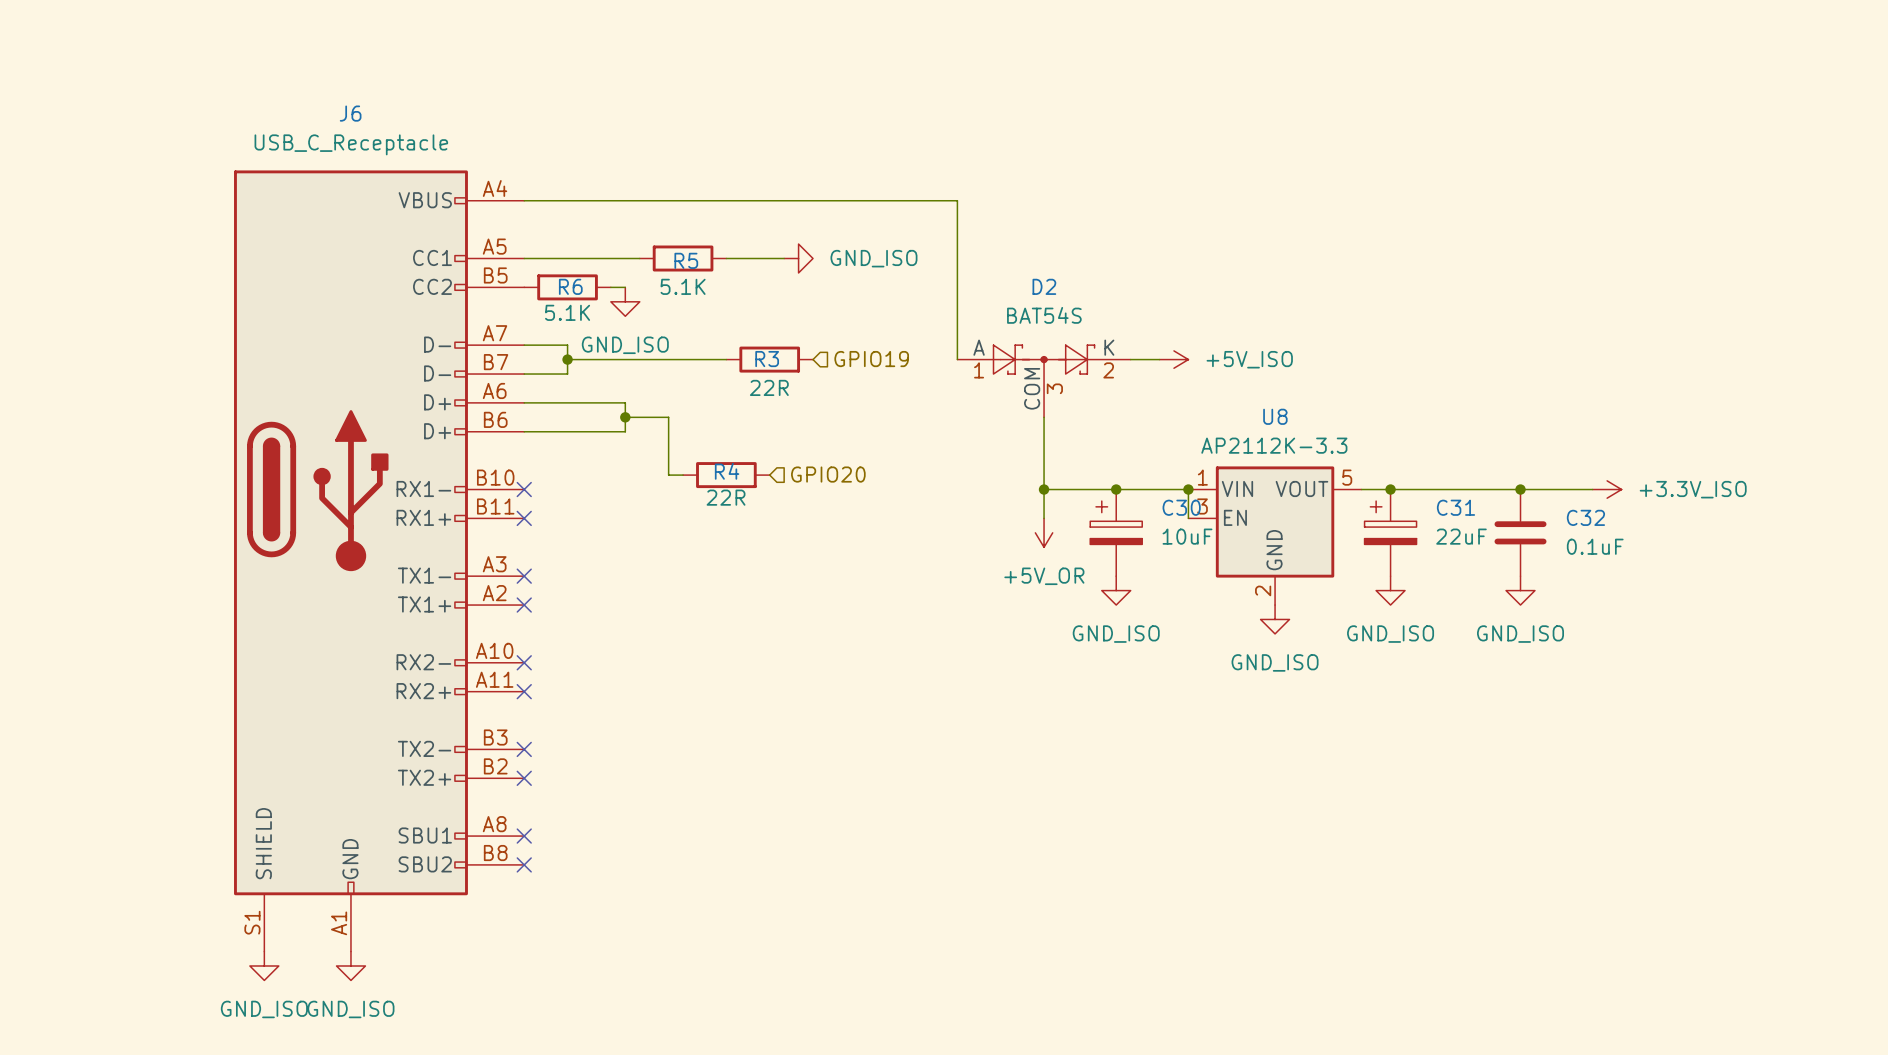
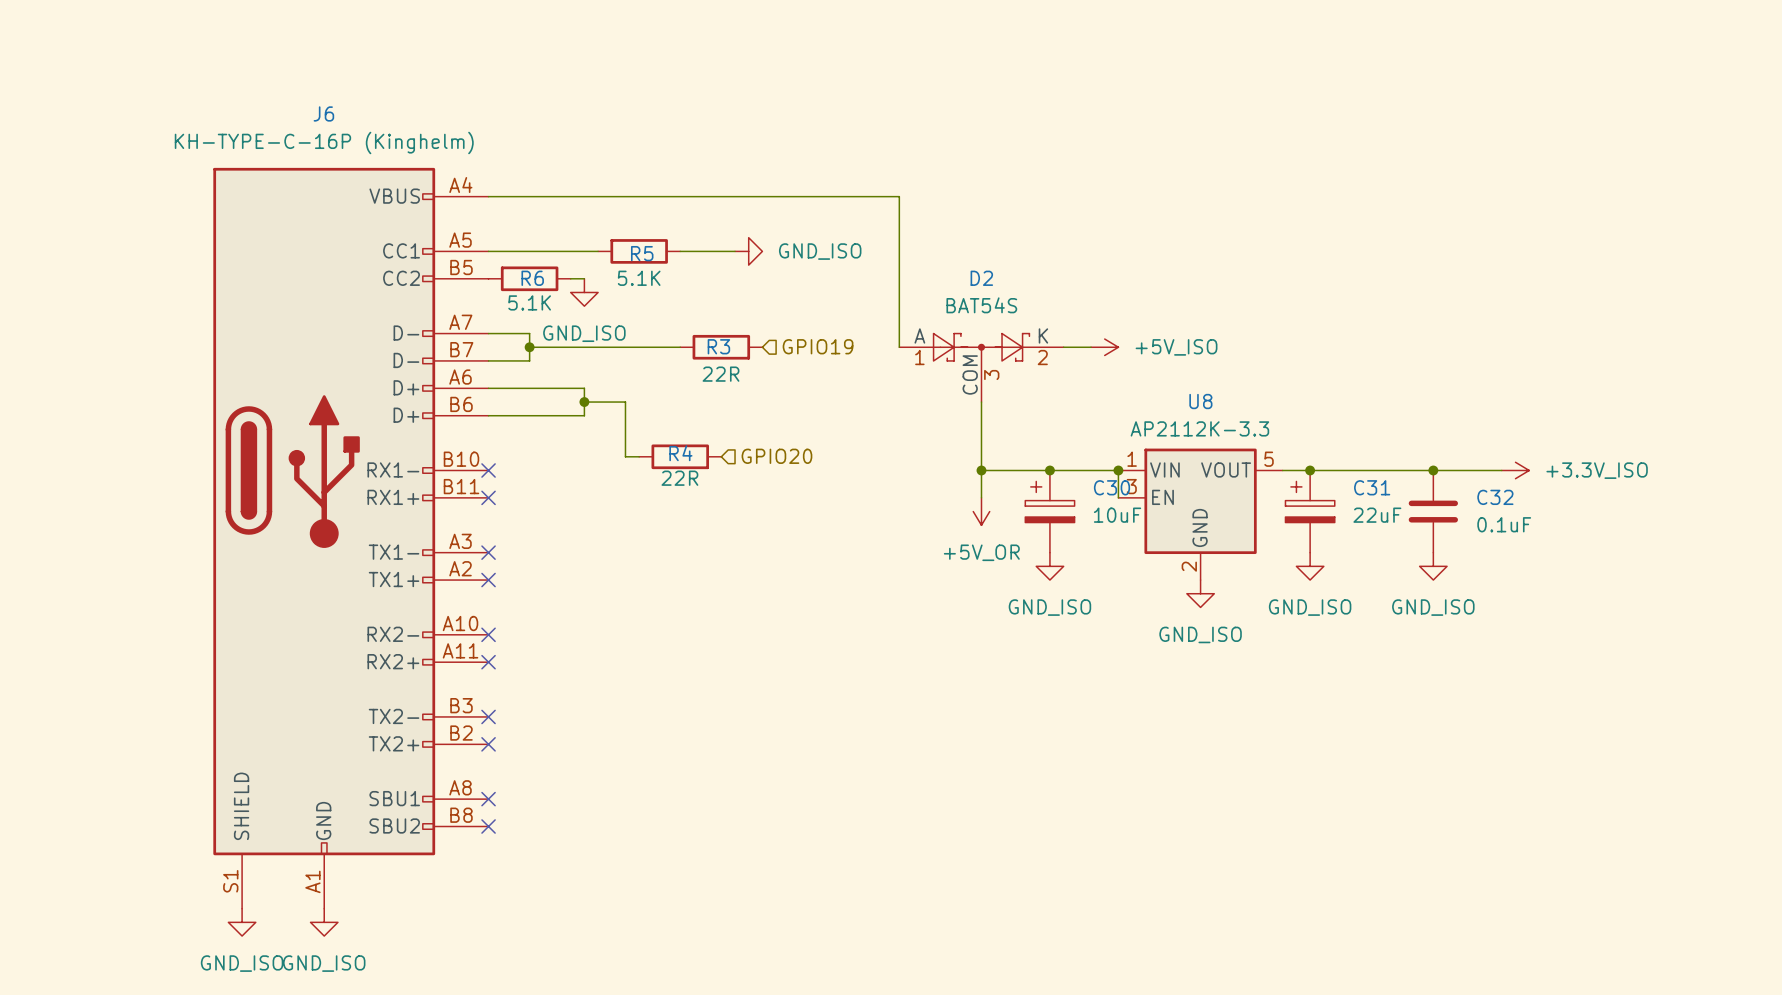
J6 value: USB_C_Receptacle (351, 144) -> KH-TYPE-C-16P (Kinghelm) (324, 142)

